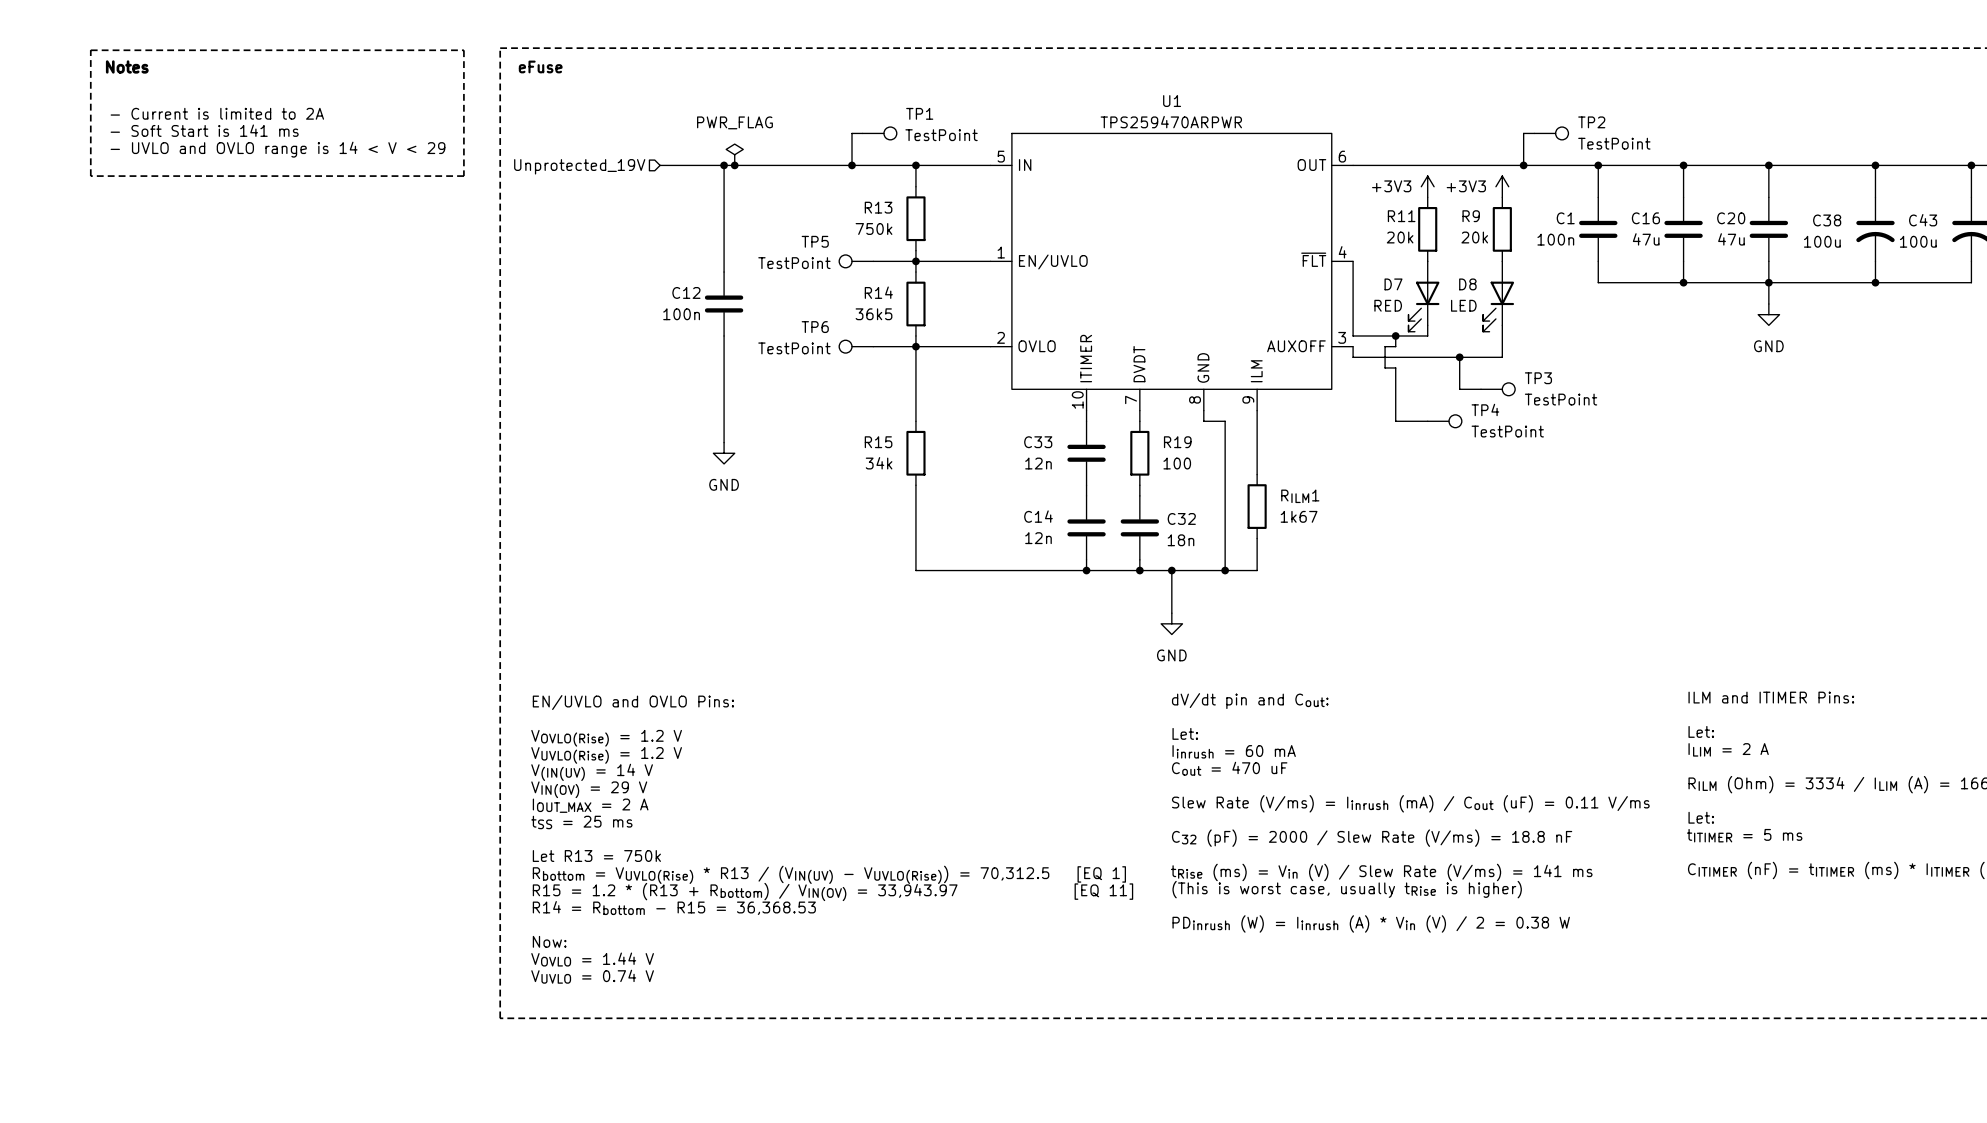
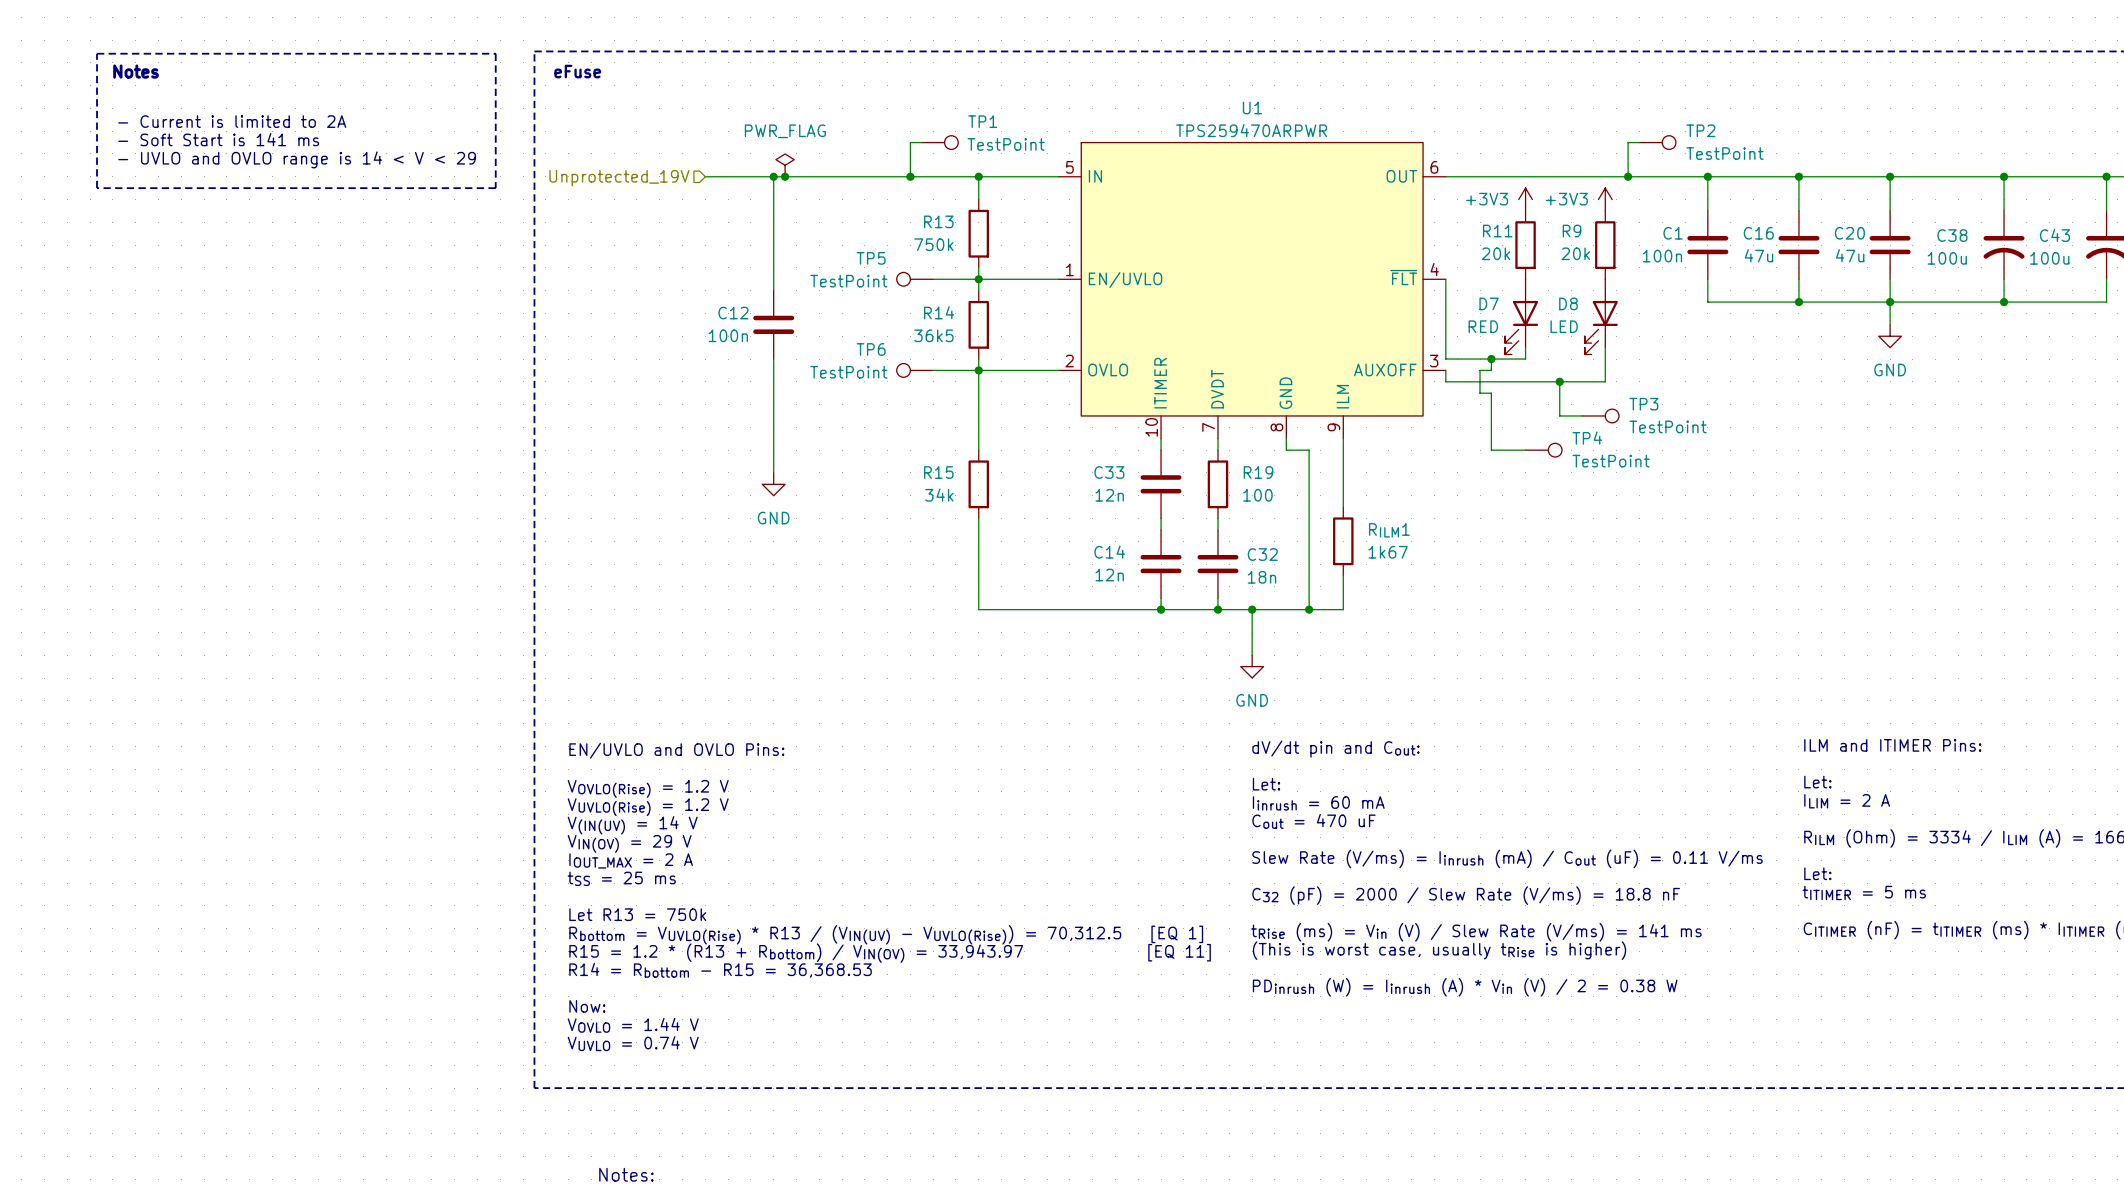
text: none -> Notes: (626, 1174)

